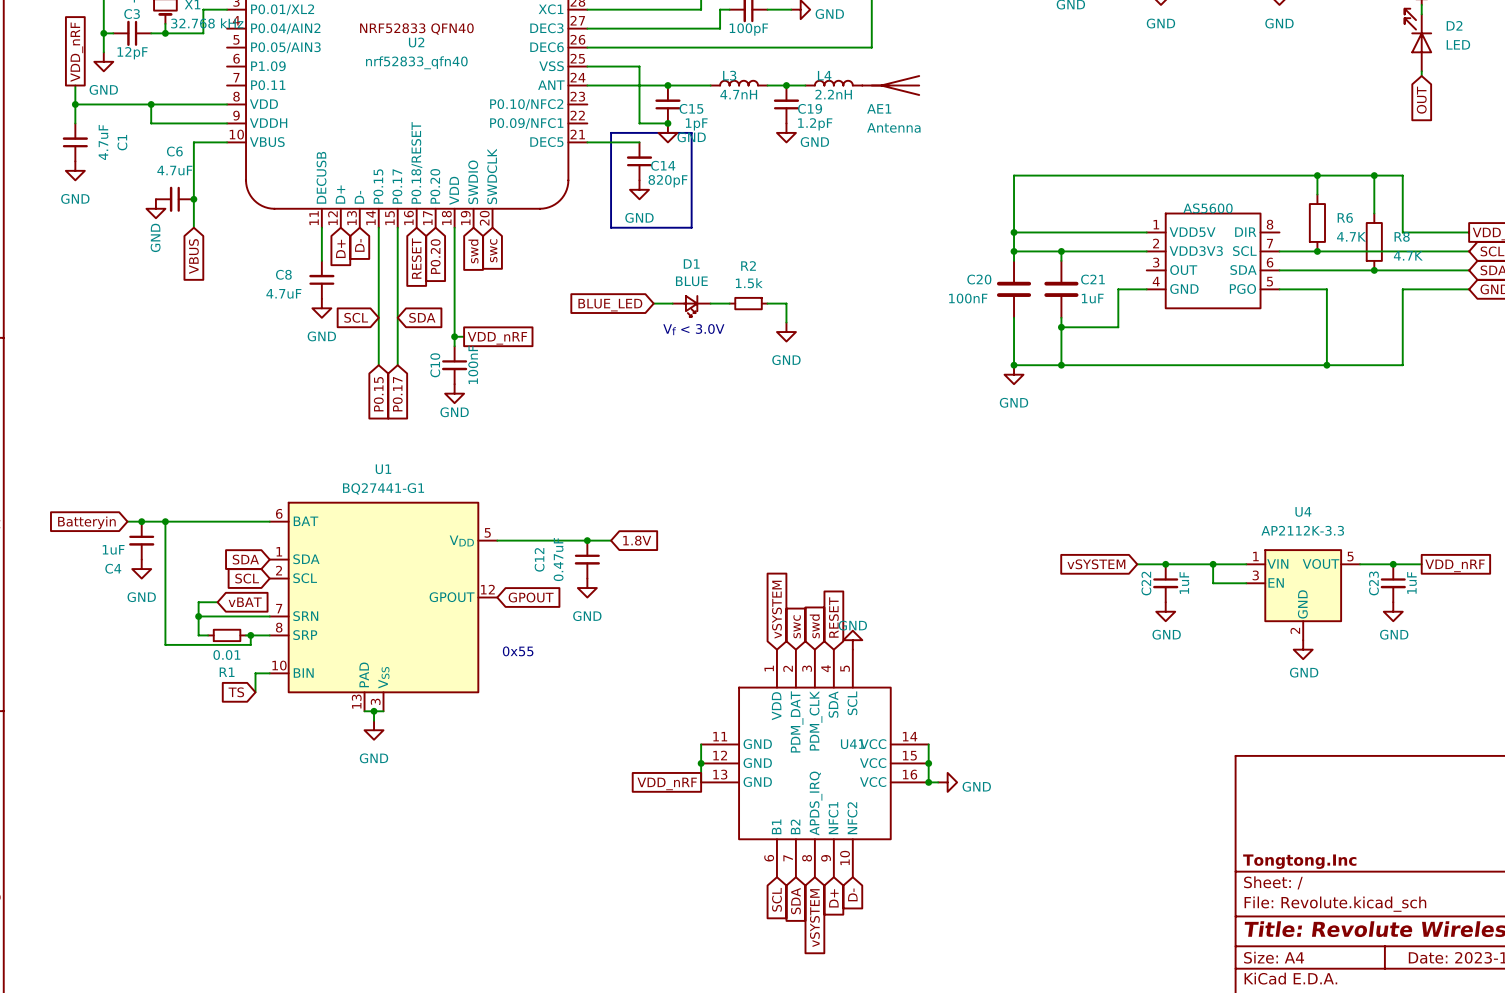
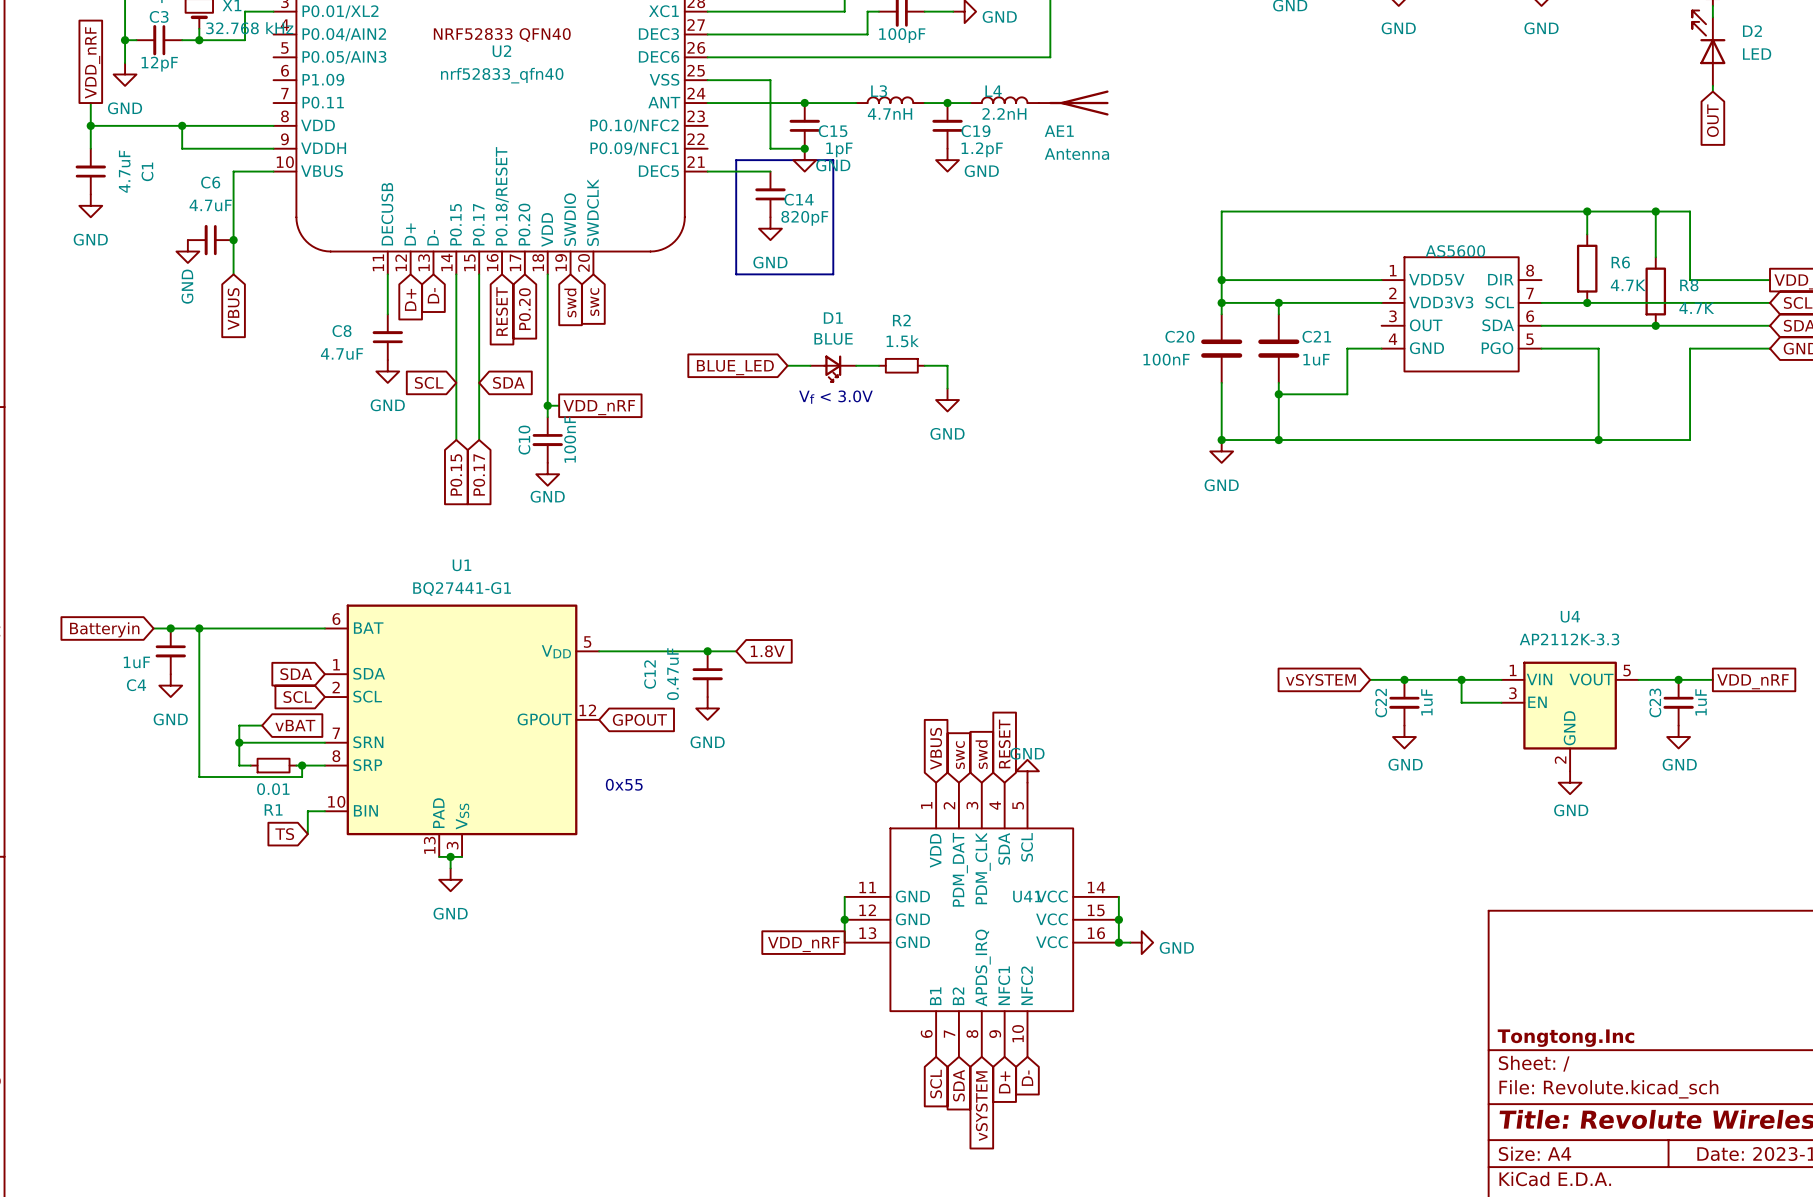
global label: vSYSTEM (776, 609) -> VBUS (936, 748)

